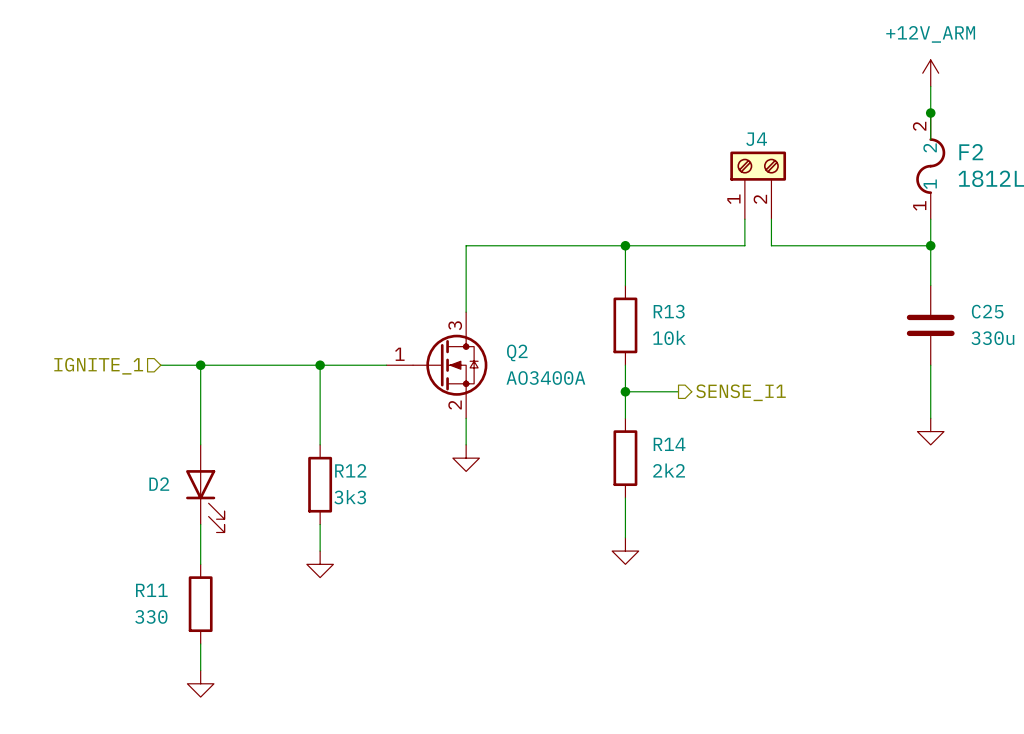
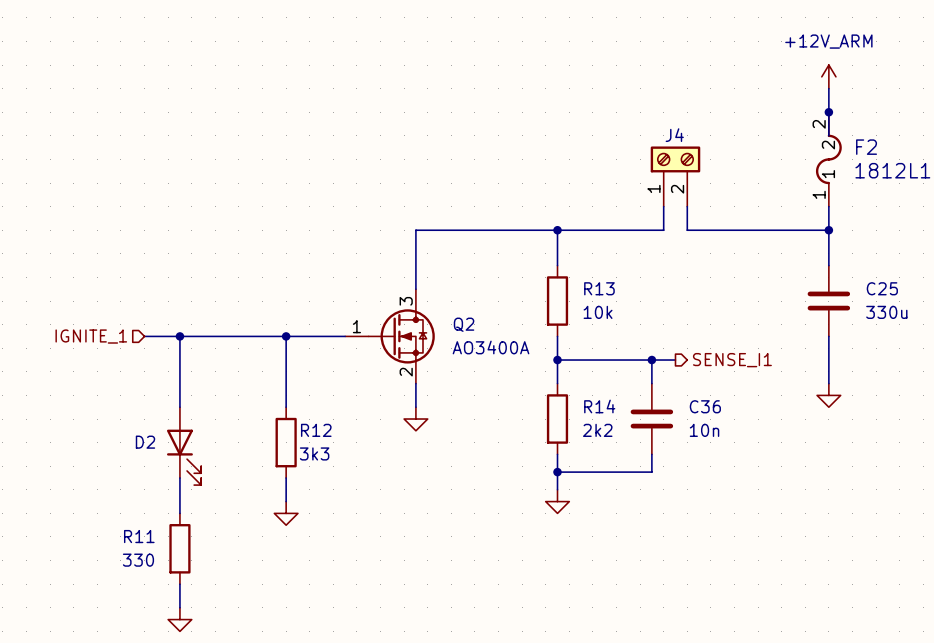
wire: none -> (604, 360) (675, 360)
wire: none -> (651, 360) (651, 383)
junction: none -> (651, 360)
hierarchical label position: SENSE_I1 (741, 392) -> SENSE_I1 (732, 360)
C36: none -> 10n (651, 419)
wire: none -> (651, 454) (651, 472) (557, 472)
junction: none -> (557, 472)

